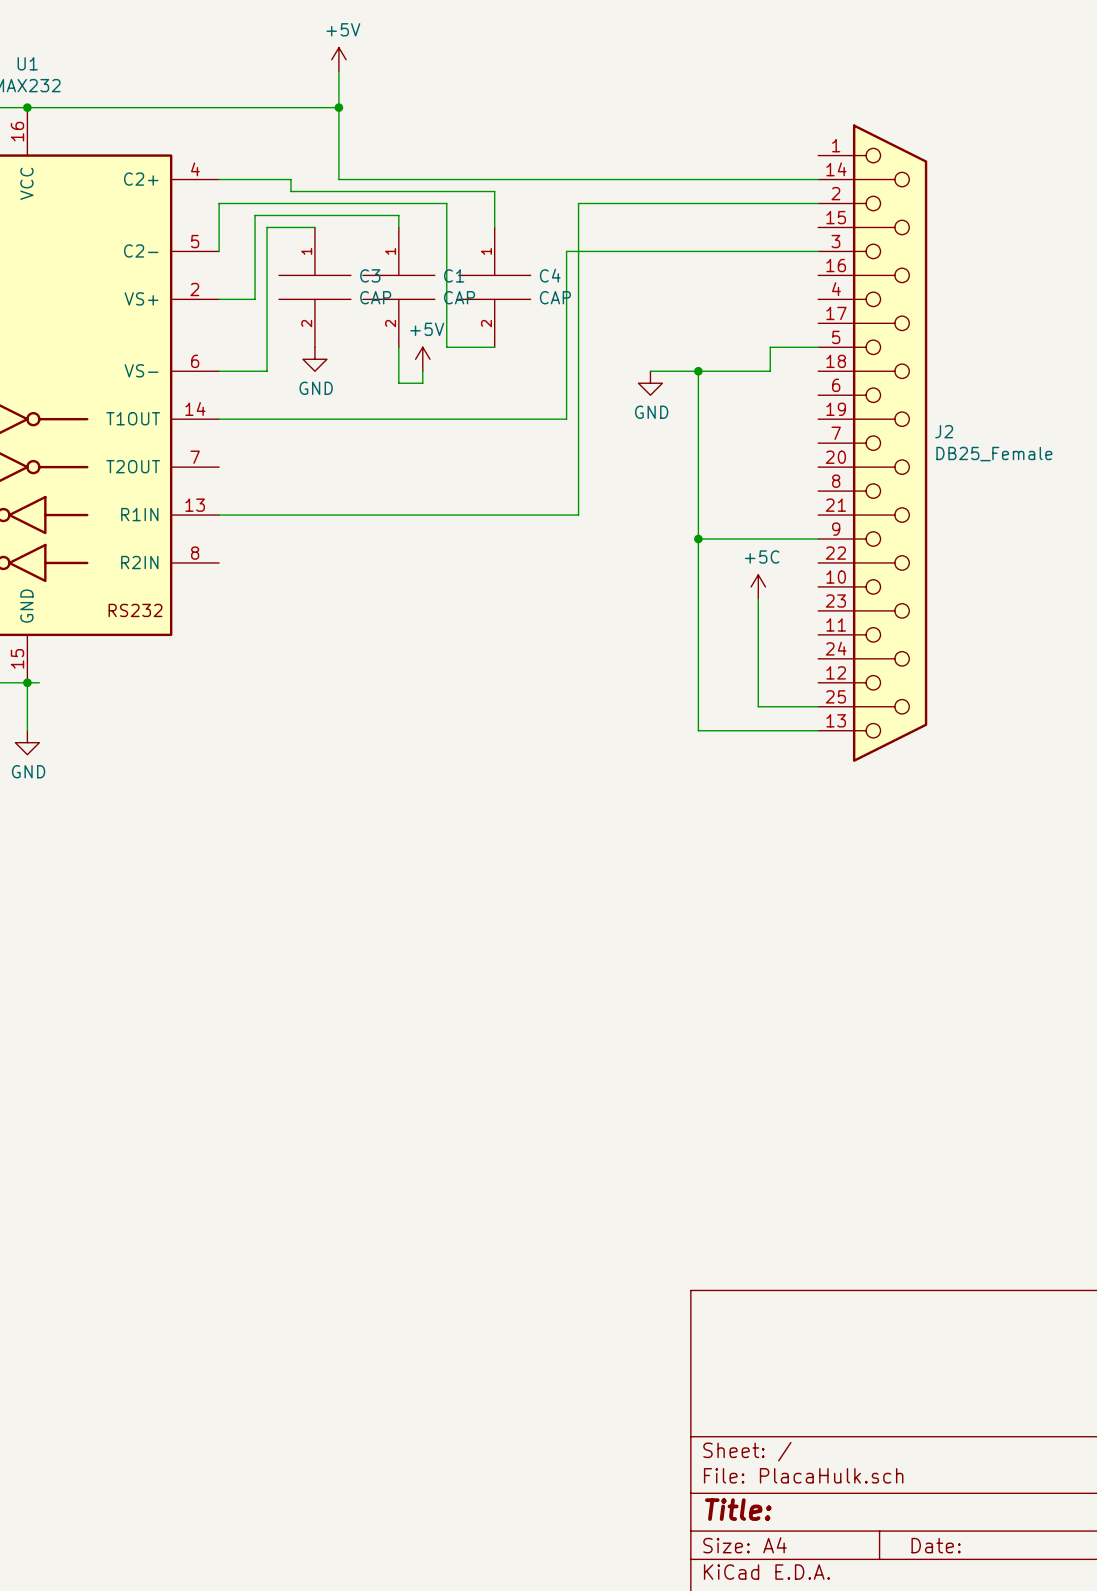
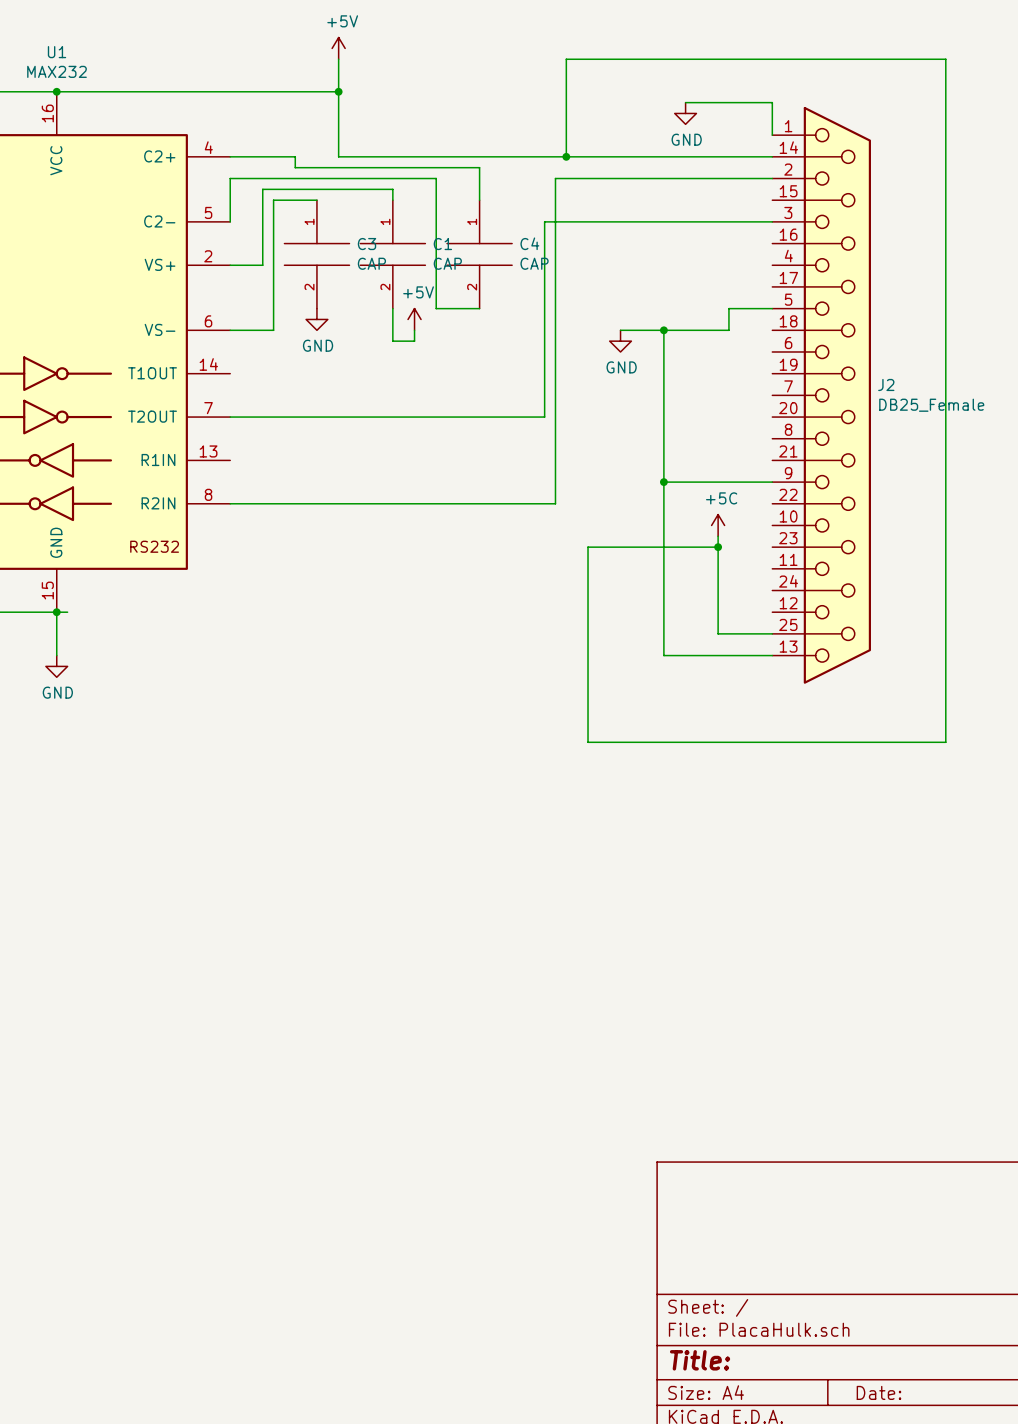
wire: none -> (685, 102) (772, 102) (772, 135)
power symbol: none -> GND (685, 113)
wire: none -> (566, 156) (566, 59) (945, 59) (945, 742) (588, 742) (588, 547) (718, 547)
junction: none -> (566, 156)
wire: (219, 419) (566, 419) -> (230, 417) (544, 417) (544, 373)
wire: (219, 515) (578, 515) -> (230, 503) (555, 503) (555, 460)
junction: none -> (718, 547)

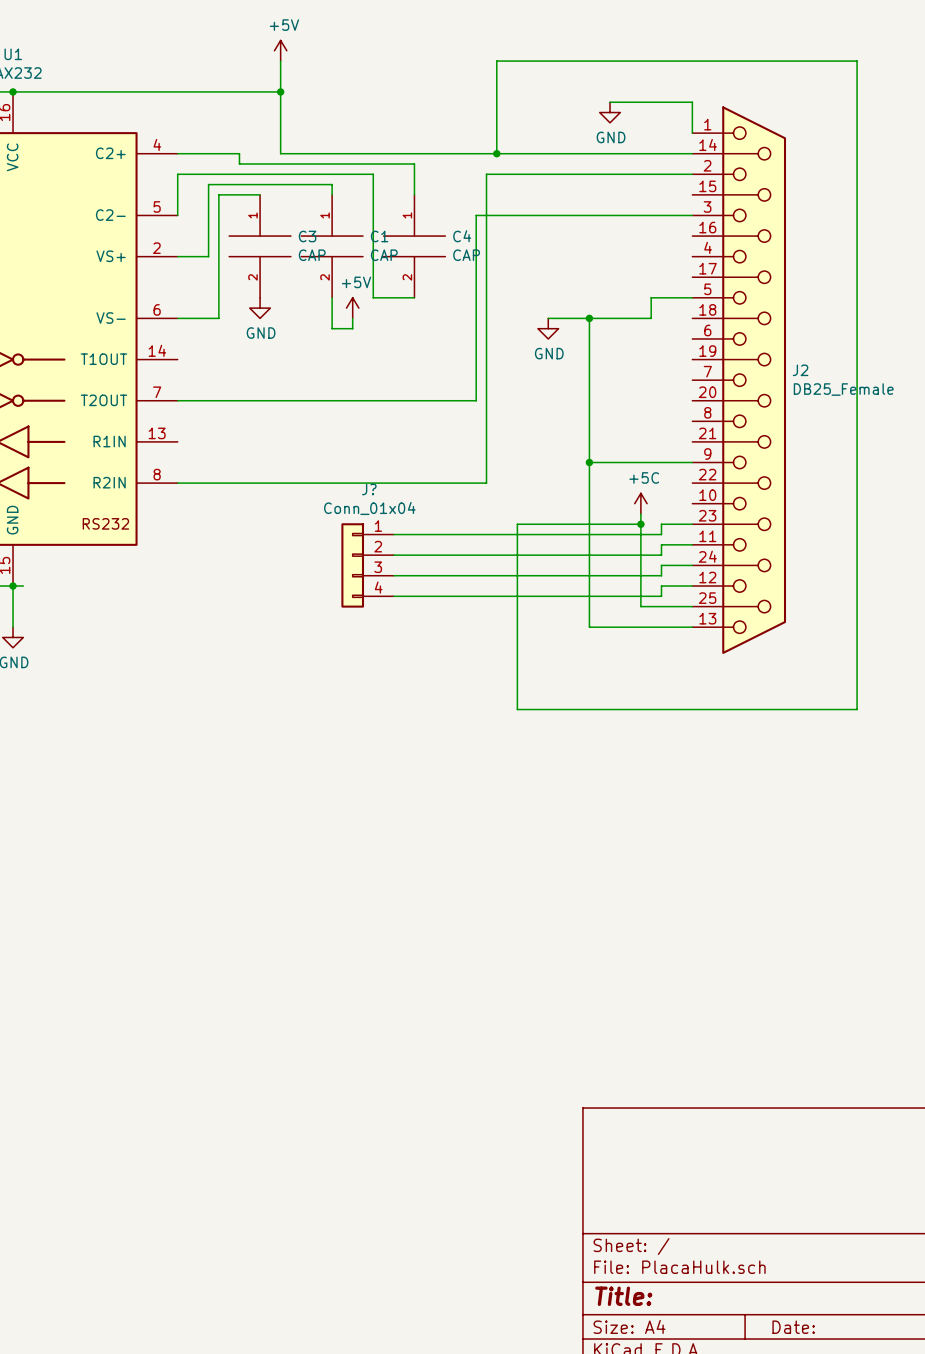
wire: none -> (692, 524) (661, 524) (661, 534) (393, 534)
wire: none -> (692, 544) (661, 544) (661, 555) (393, 555)
J?: none -> Conn_01x04 (367, 565)
wire: none -> (692, 565) (661, 565) (661, 575) (393, 575)
wire: none -> (692, 586) (661, 586) (661, 596) (393, 596)

